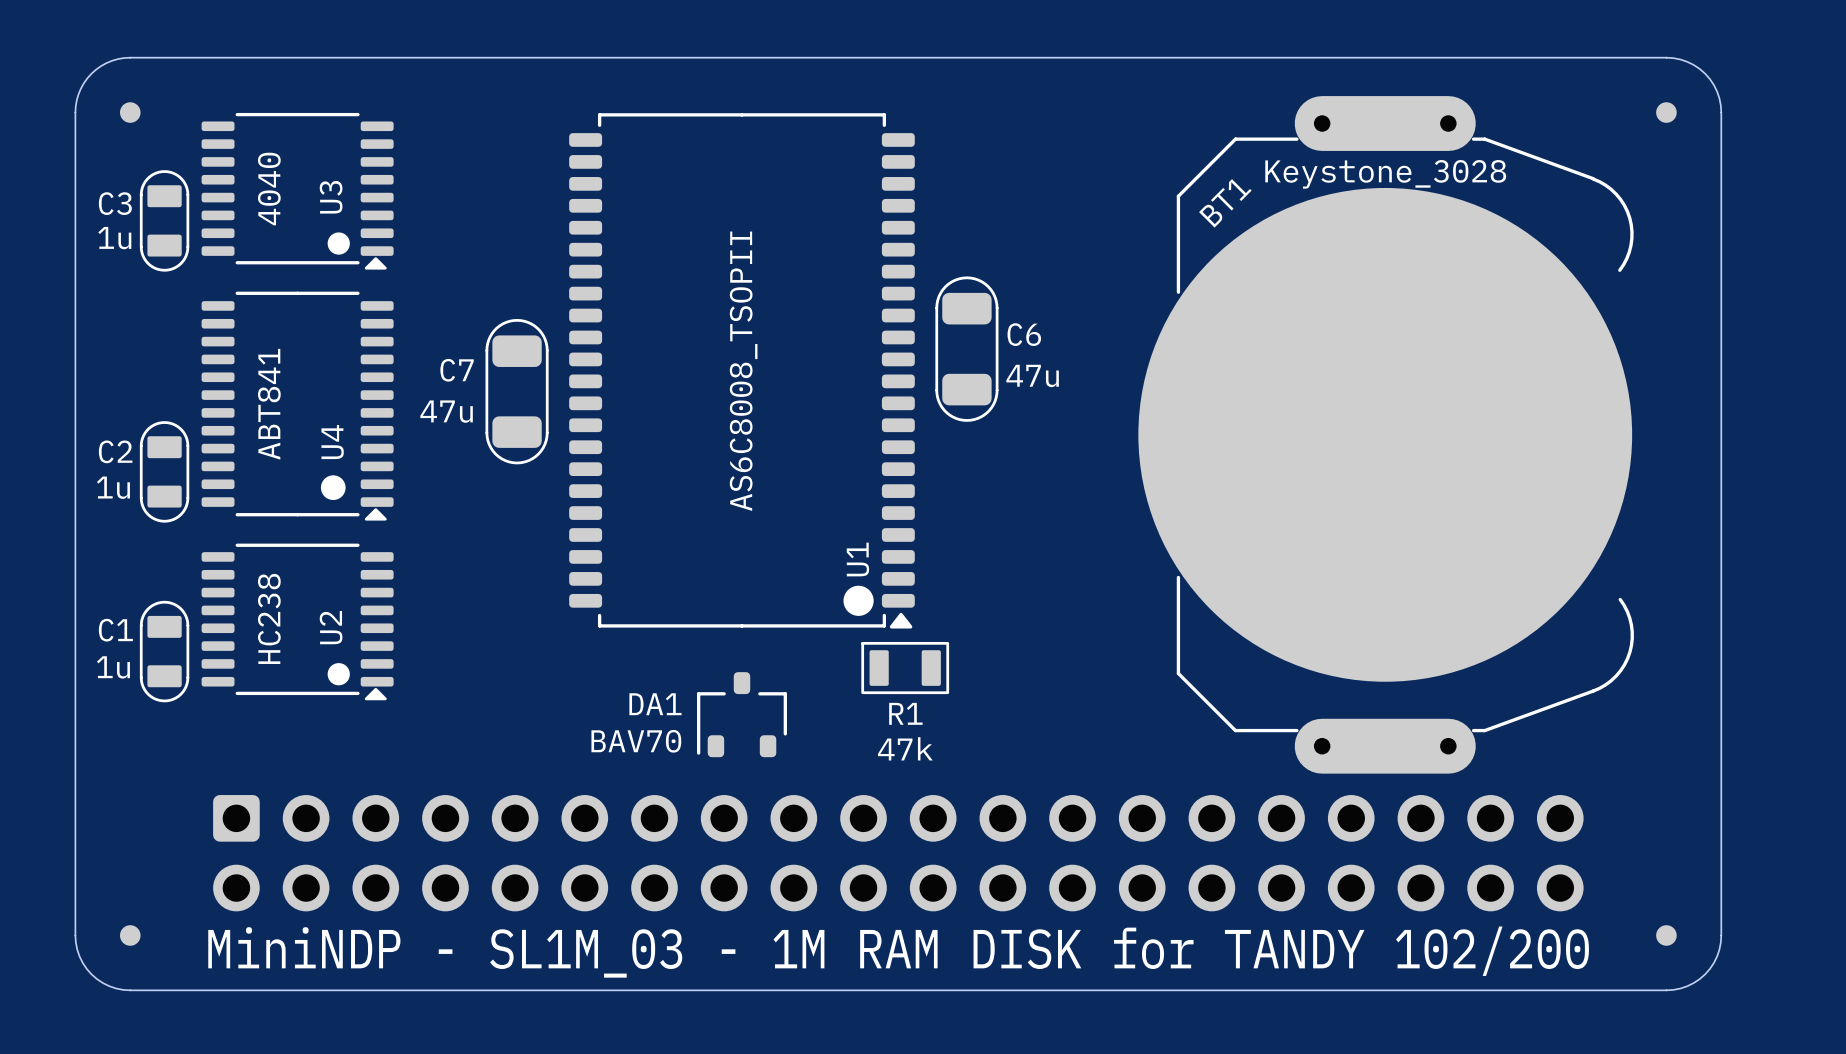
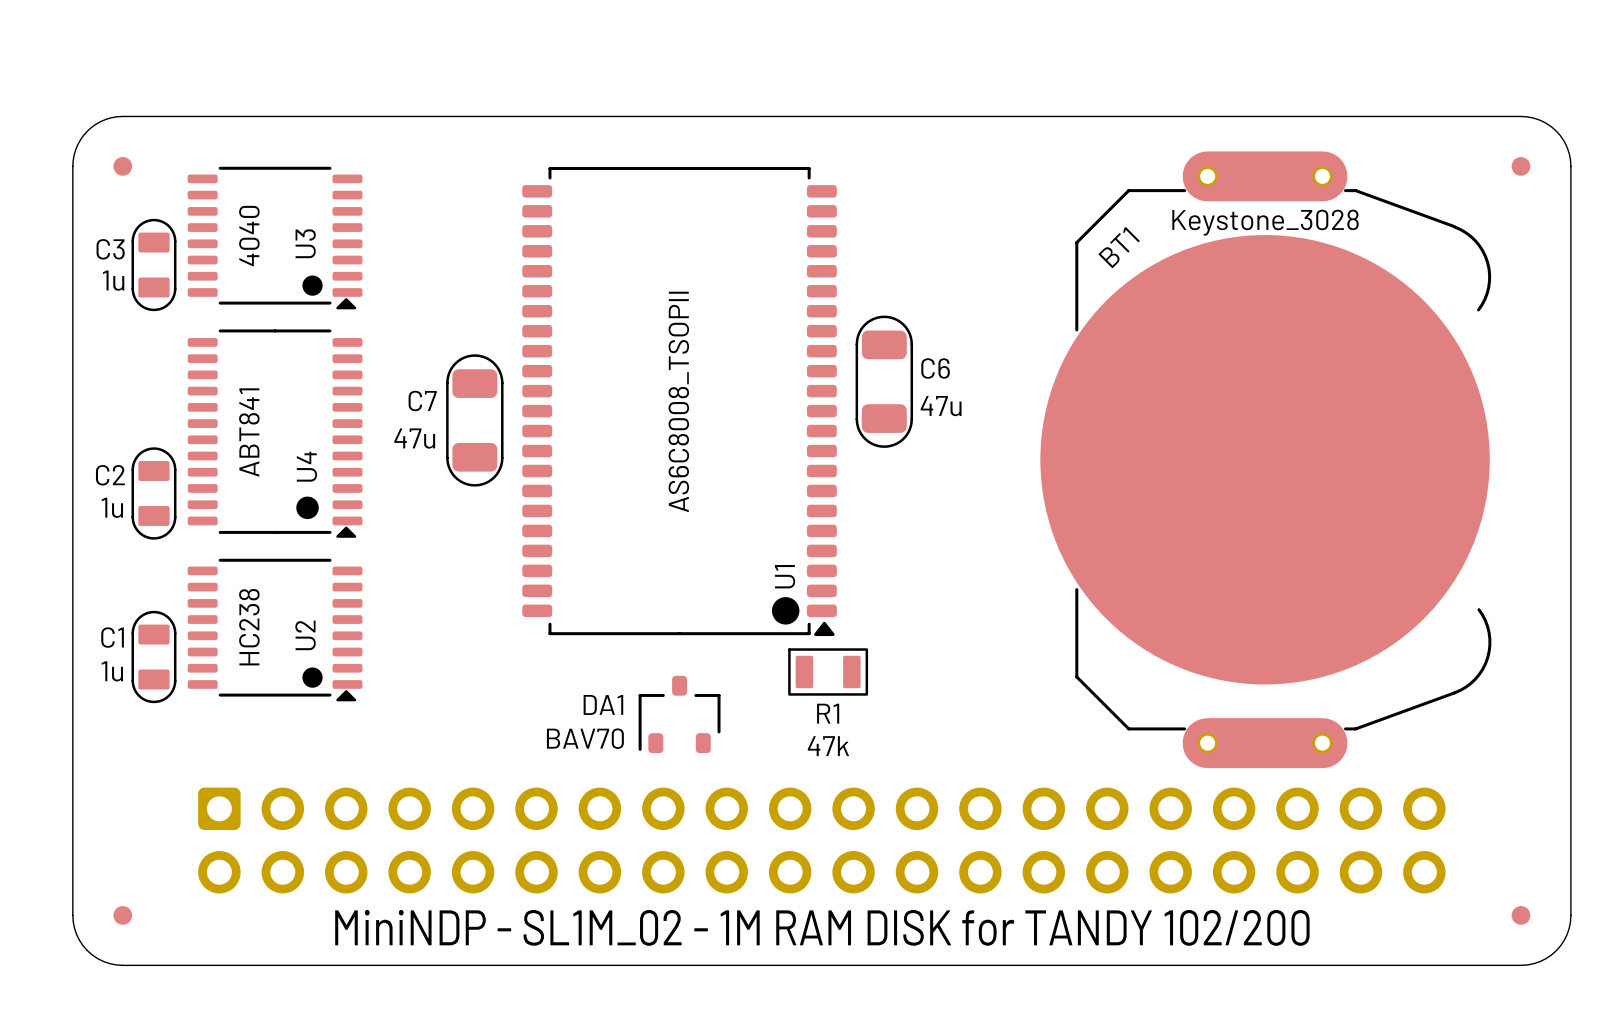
text: MiniNDP - SL1M_03 - 1M RAM DISK for TANDY 102/200 (898, 952) -> MiniNDP - SL1M_02 - 1M RAM DISK for TANDY 102/200 (822, 927)

